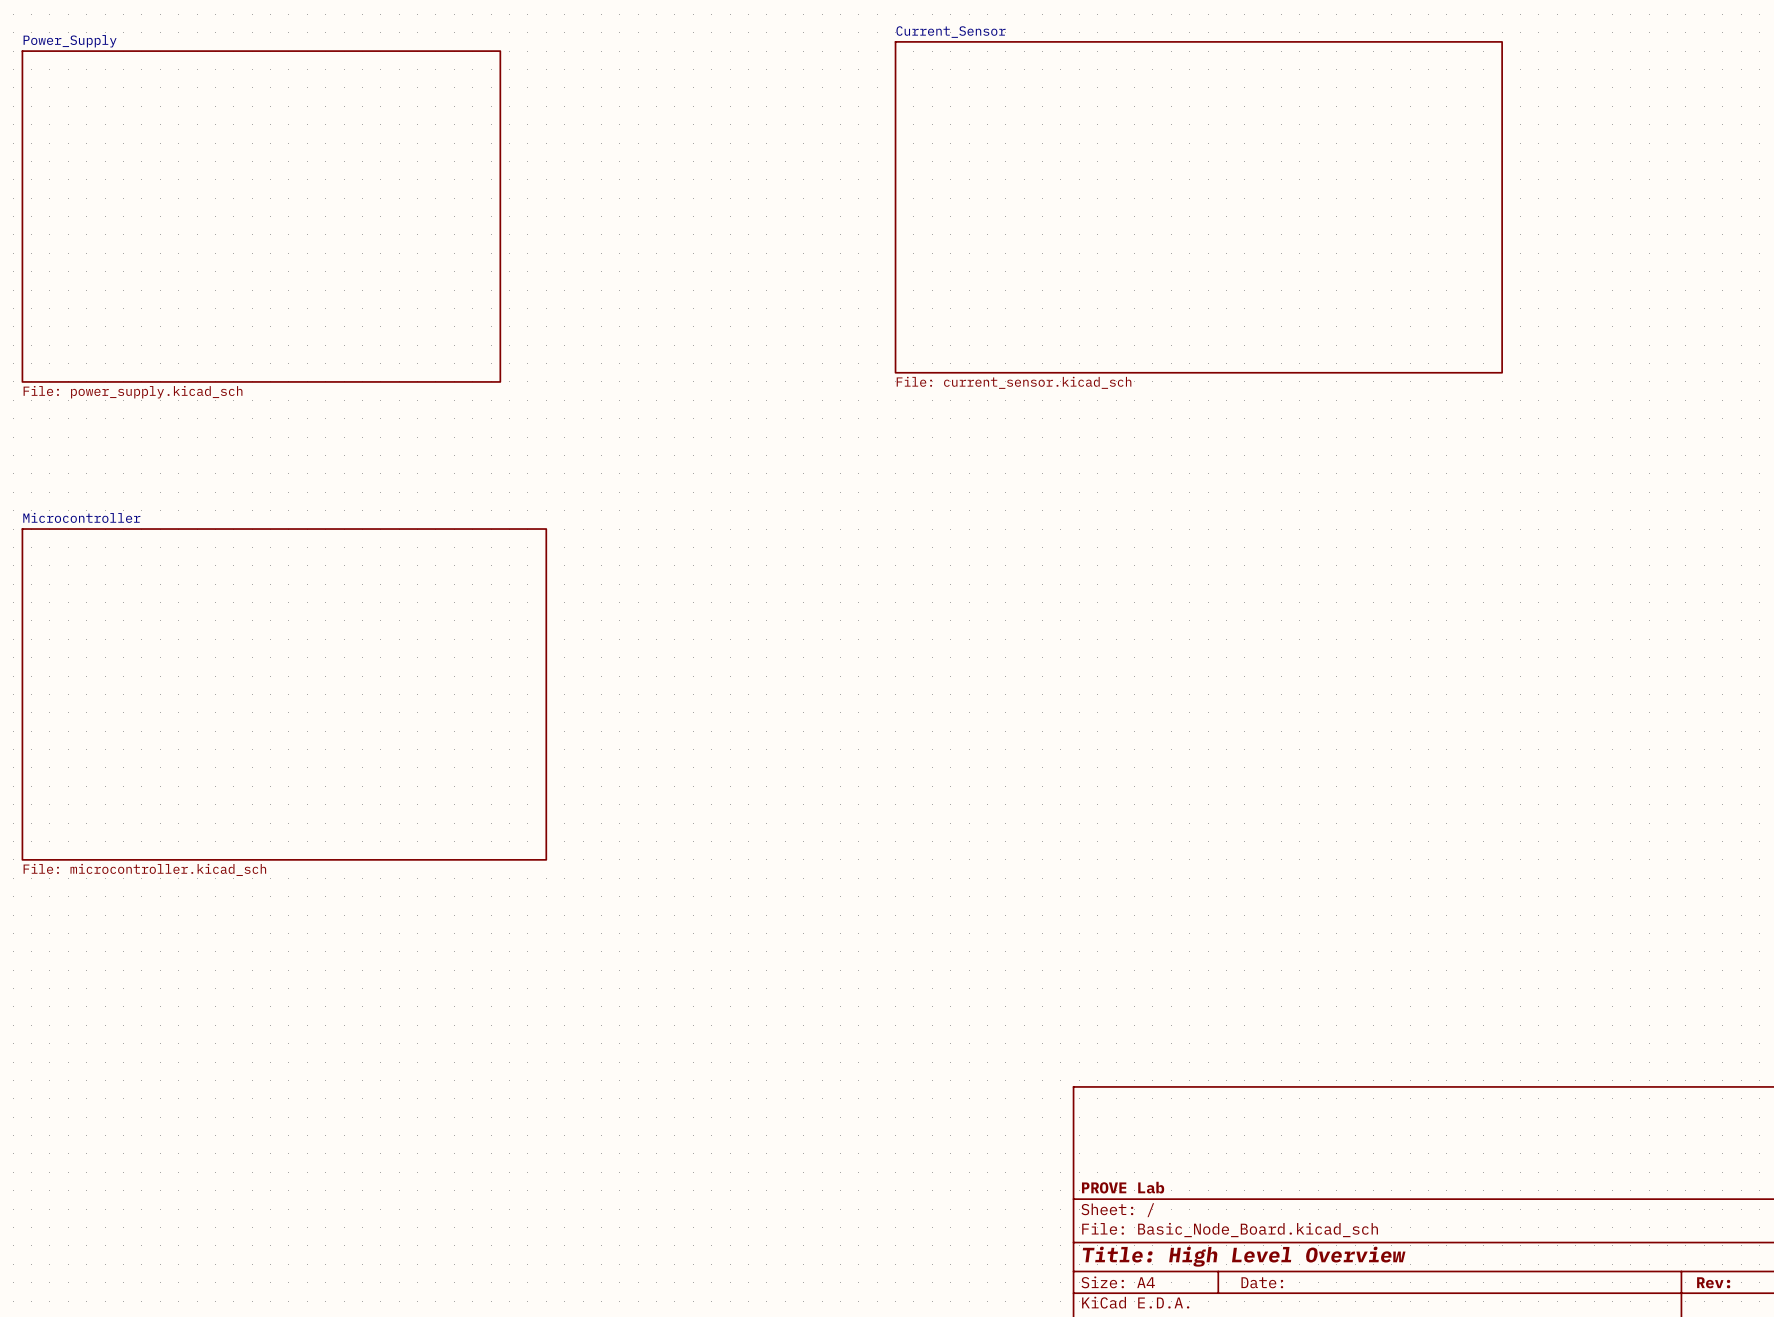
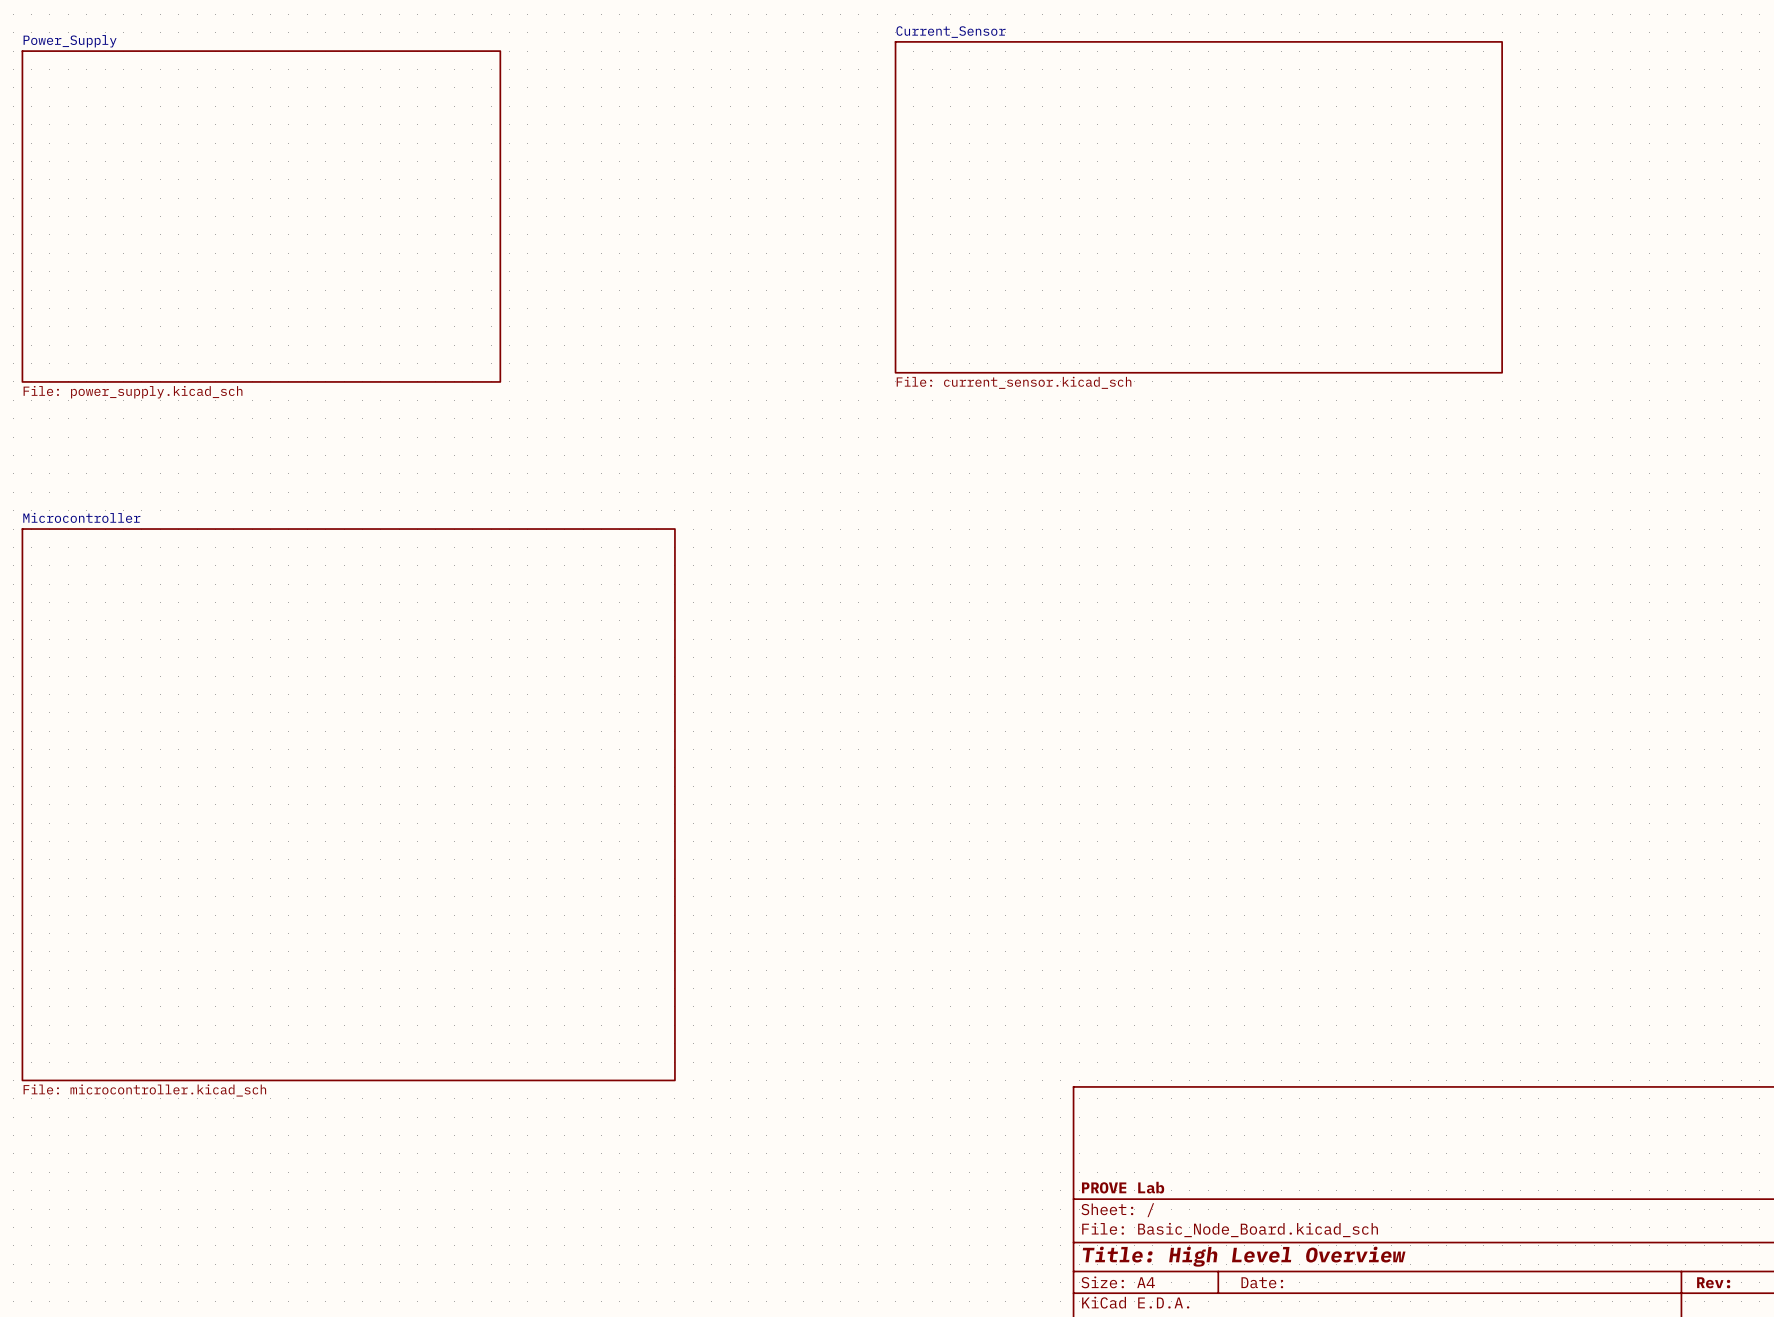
sheet Microcontroller: File: microcontroller.kicad_sch (284, 694) -> none
sheet Microcontroller: none -> File: microcontroller.kicad_sch (348, 804)

